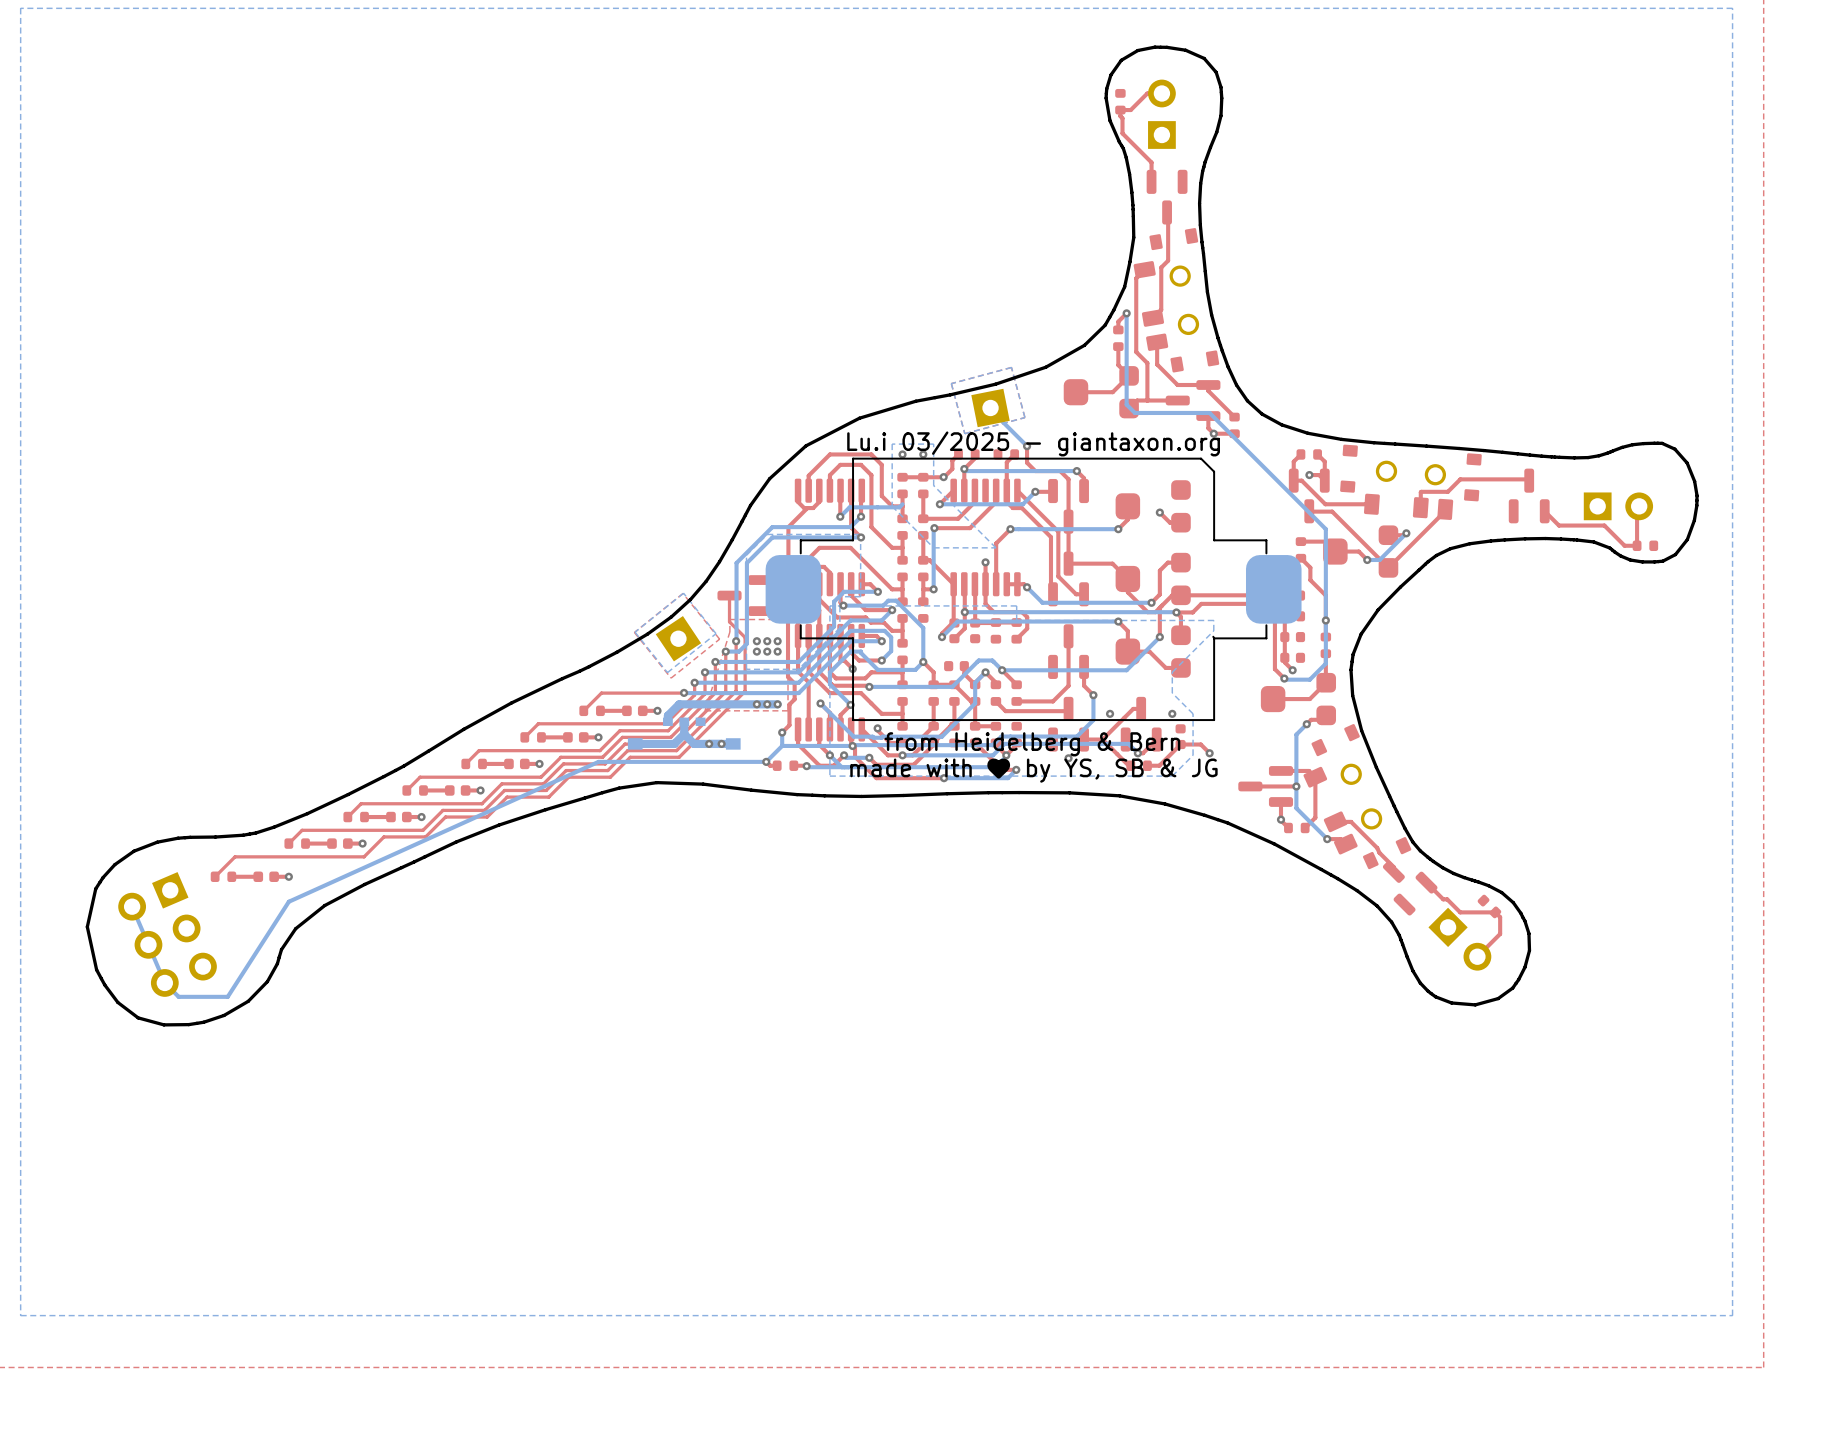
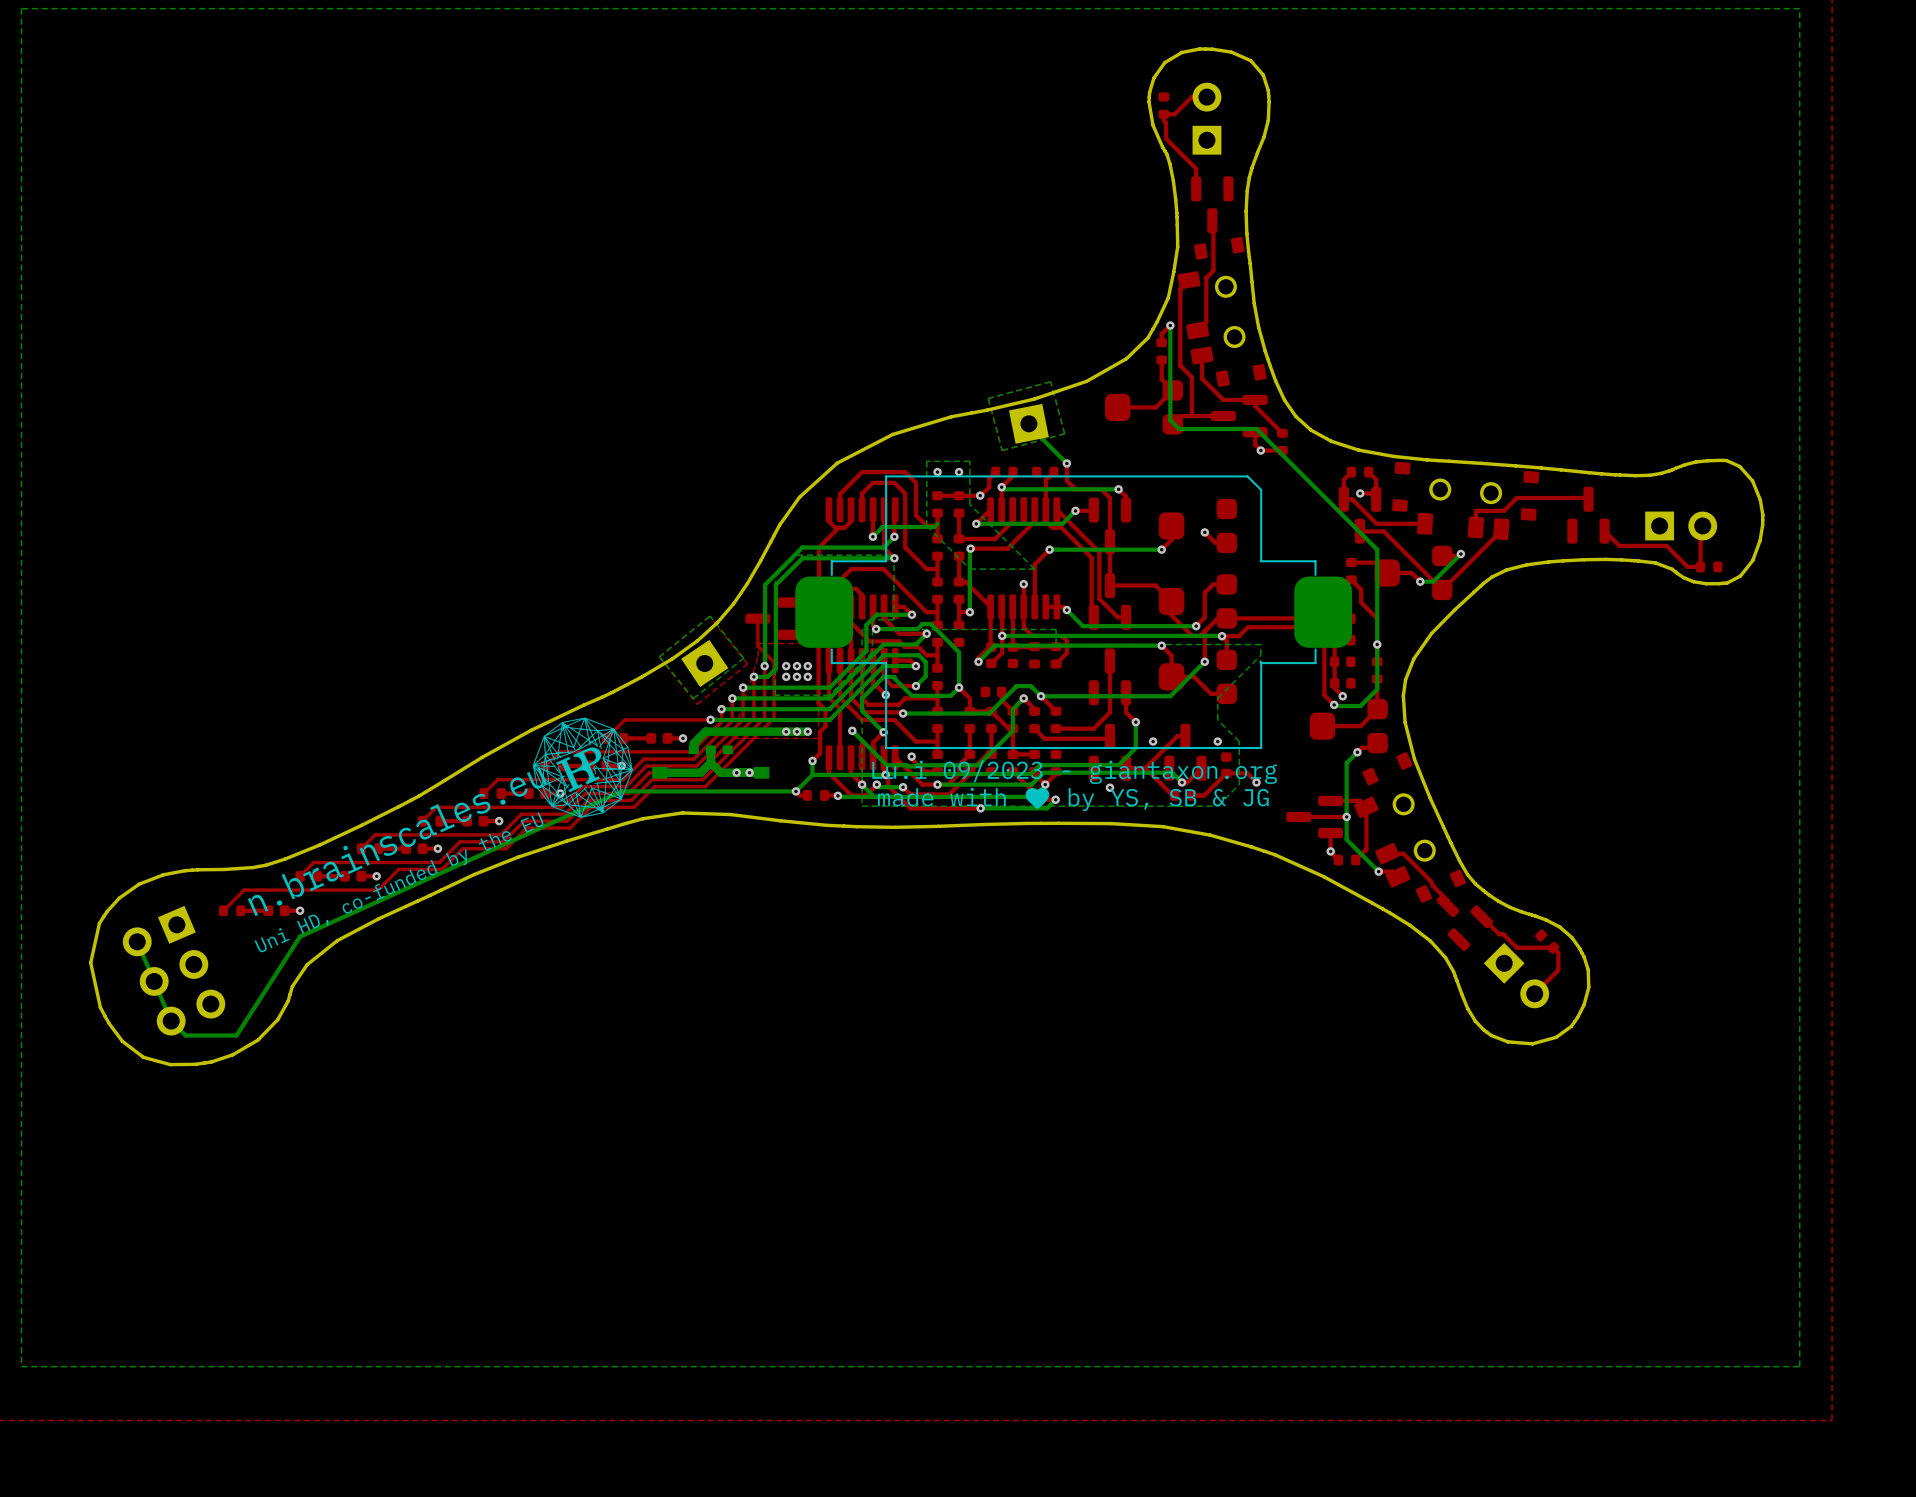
text: Lu.i 03/2025 - giantaxon.org (1033, 443) -> none
drawing: none -> [532, 717, 633, 818]
text: from Heidelberg & Bern (1032, 744) -> Lu.i 09/2023 - giantaxon.org (1074, 772)
text: none -> n.brainscales.eu (397, 841)
text: none -> Uni HD, co-funded by the EU (399, 882)

